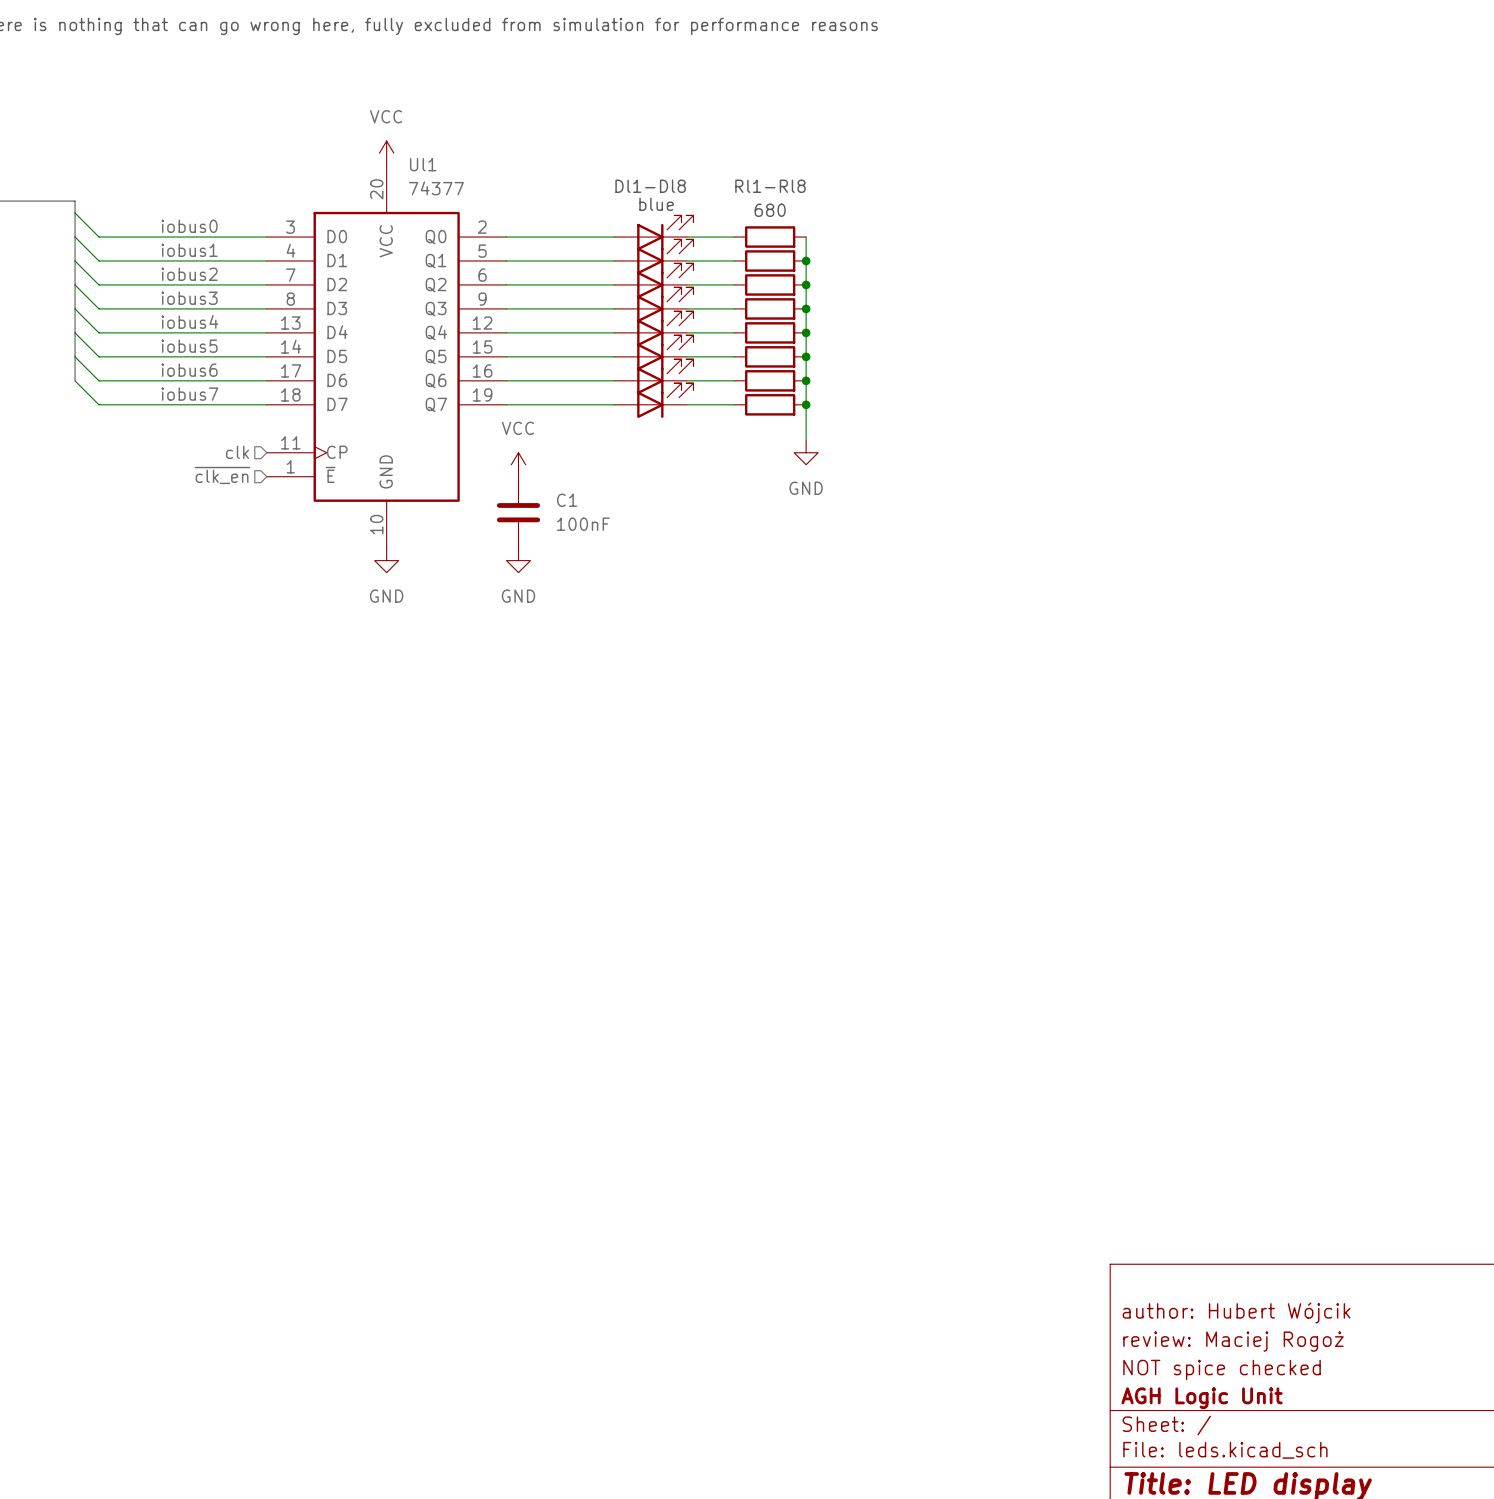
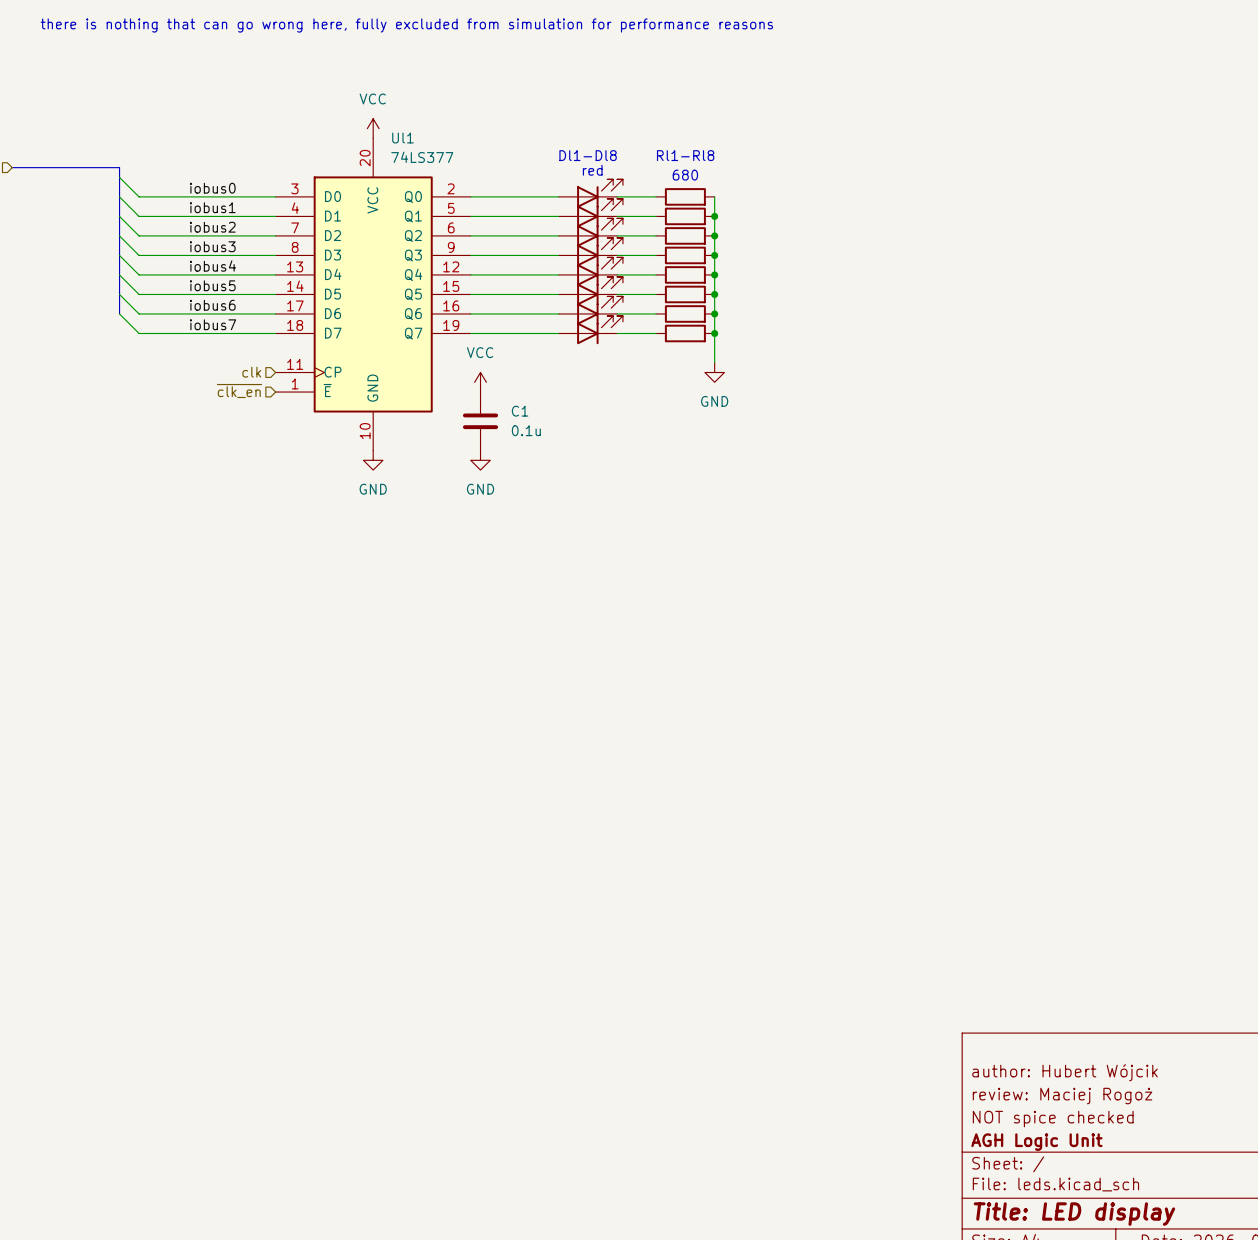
Ul1 value: 74377 (436, 188) -> 74LS377 (422, 157)
text: blue (656, 204) -> red (592, 170)
C1 value: 100nF (583, 524) -> 0.1u (526, 430)

